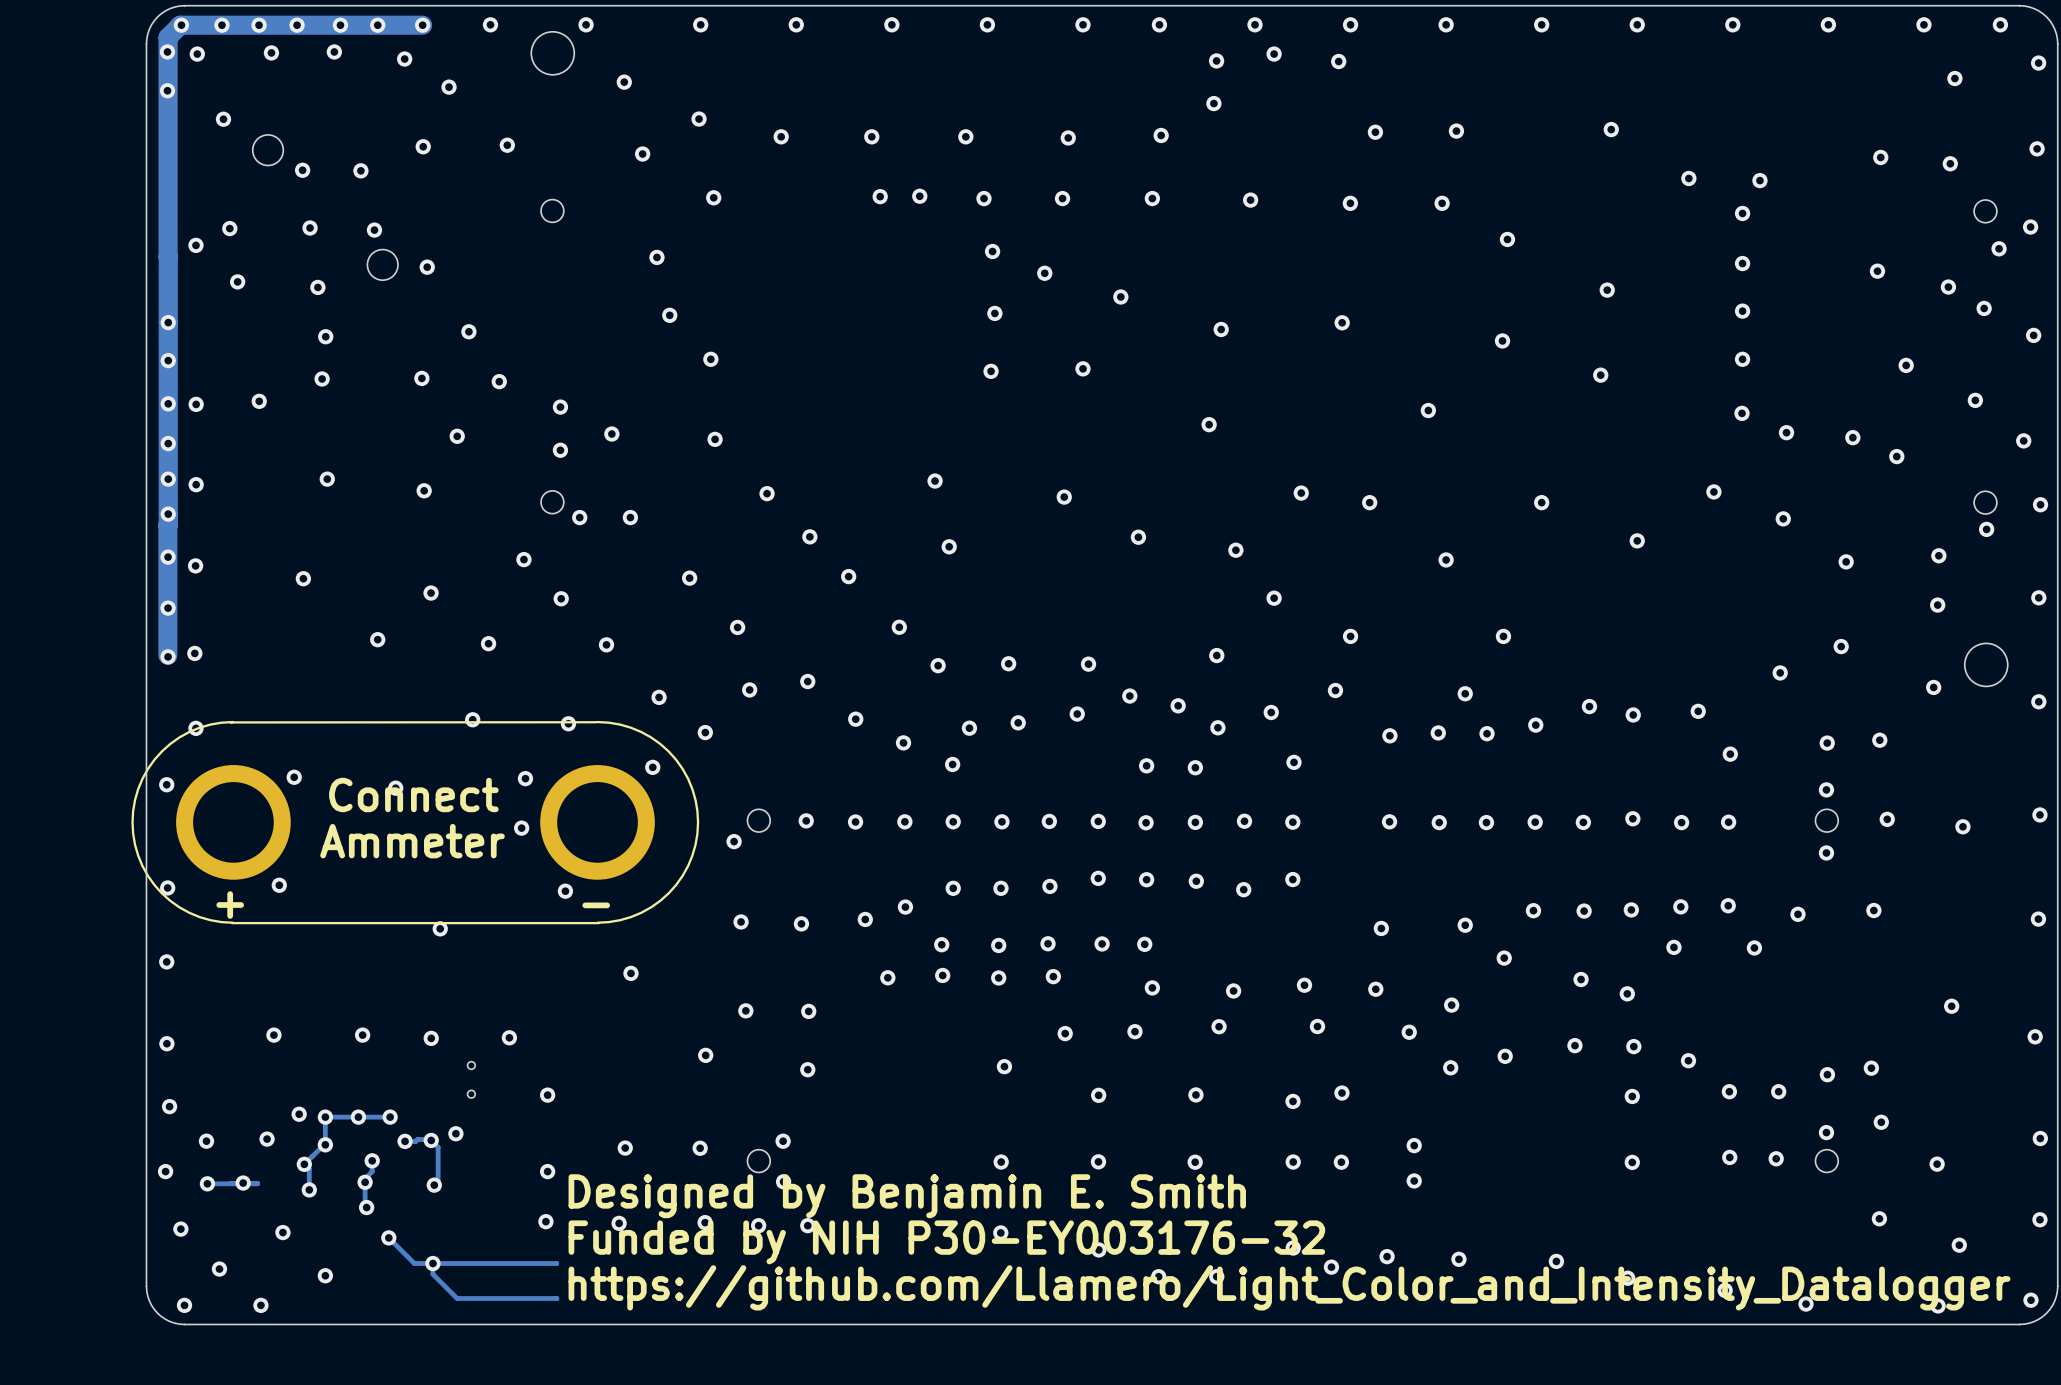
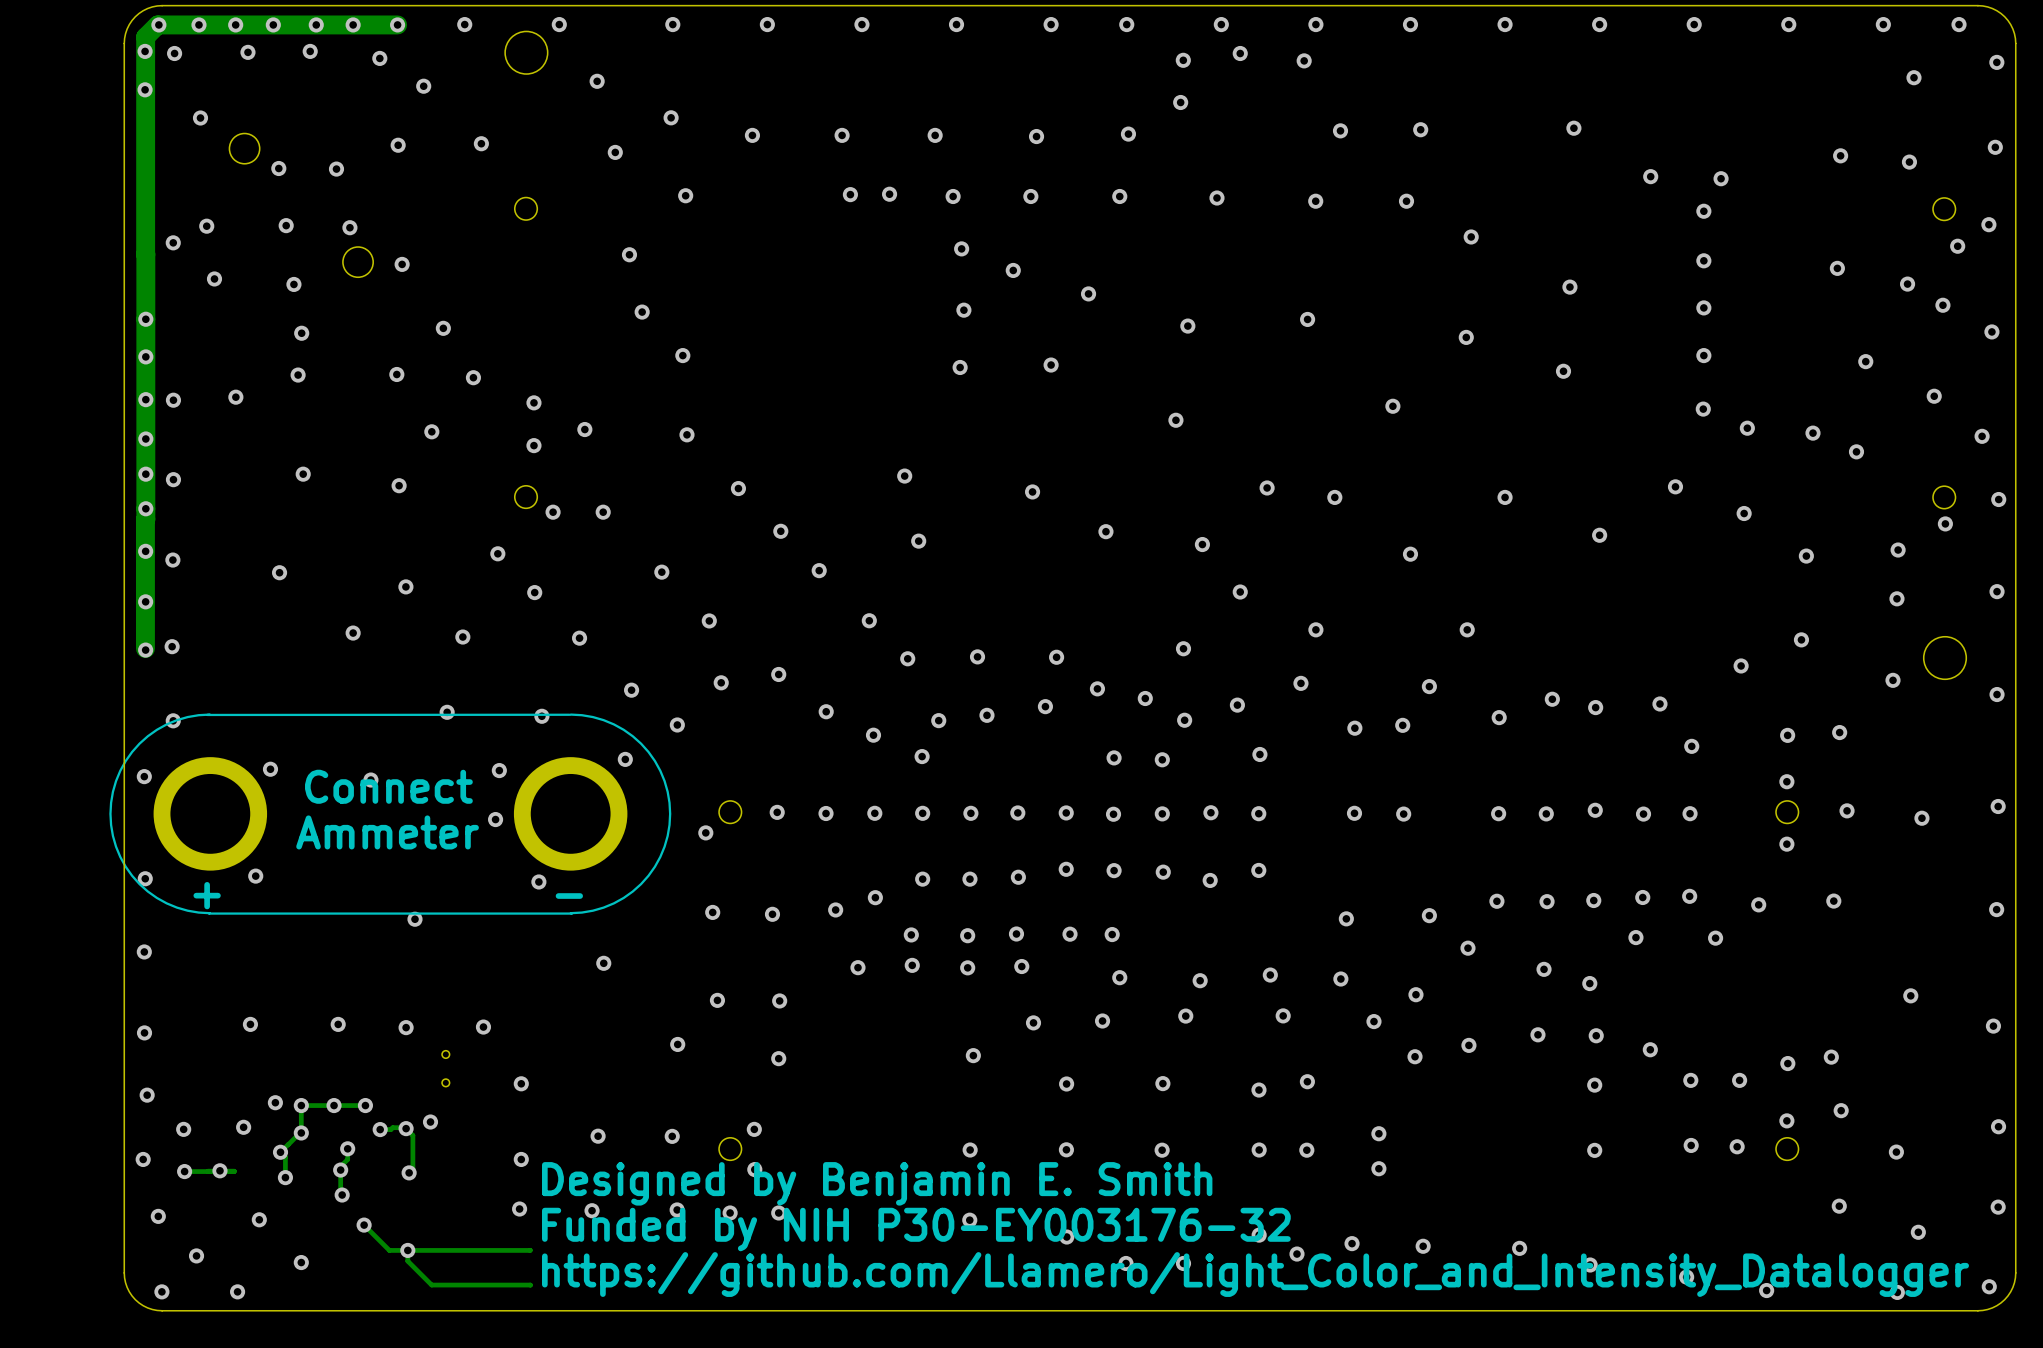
via: (1487, 733) -> none
via: (1486, 822) -> none

